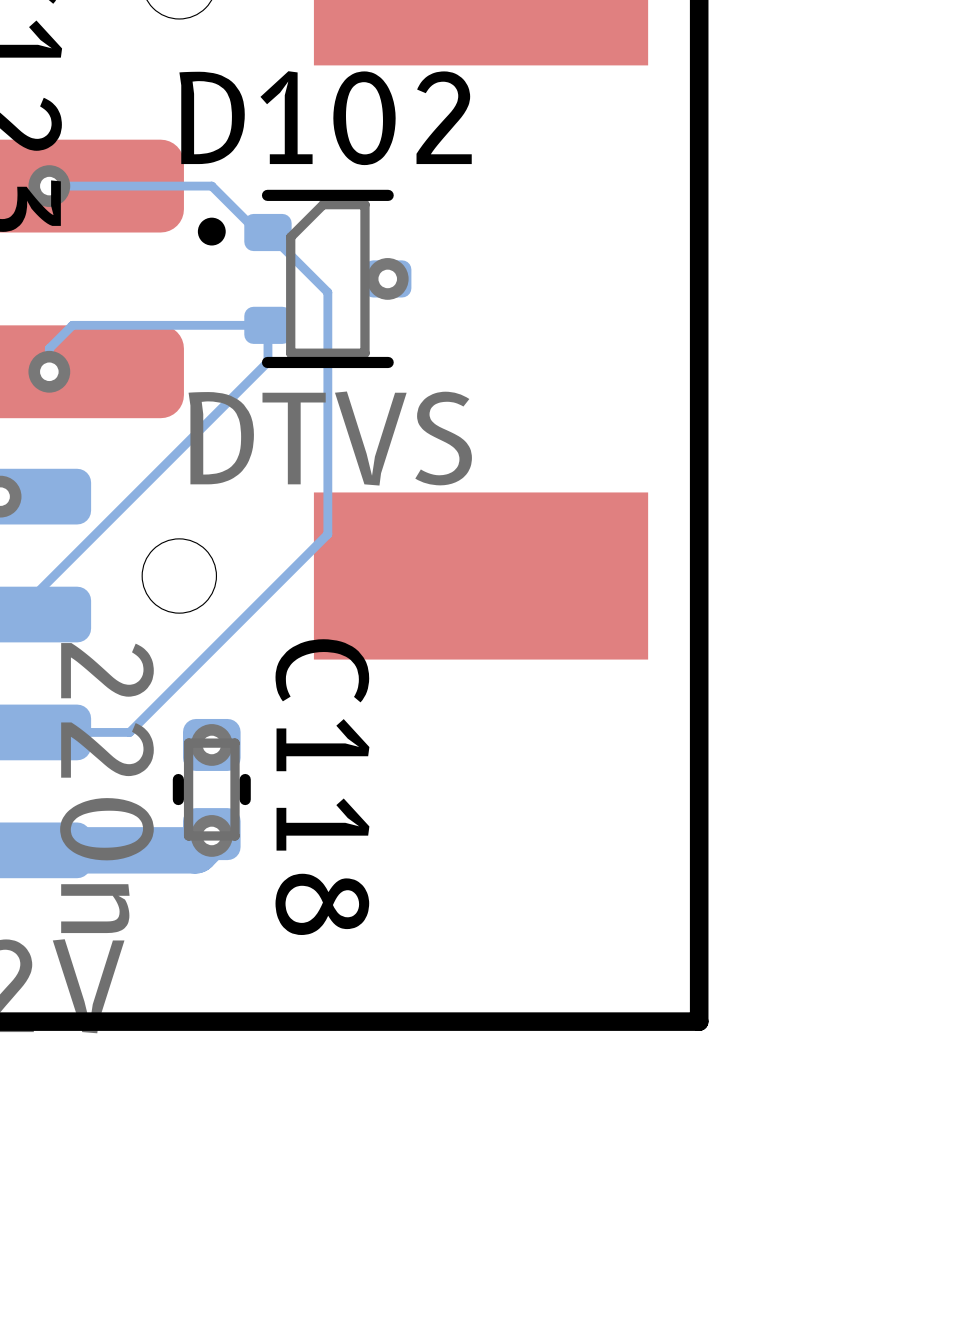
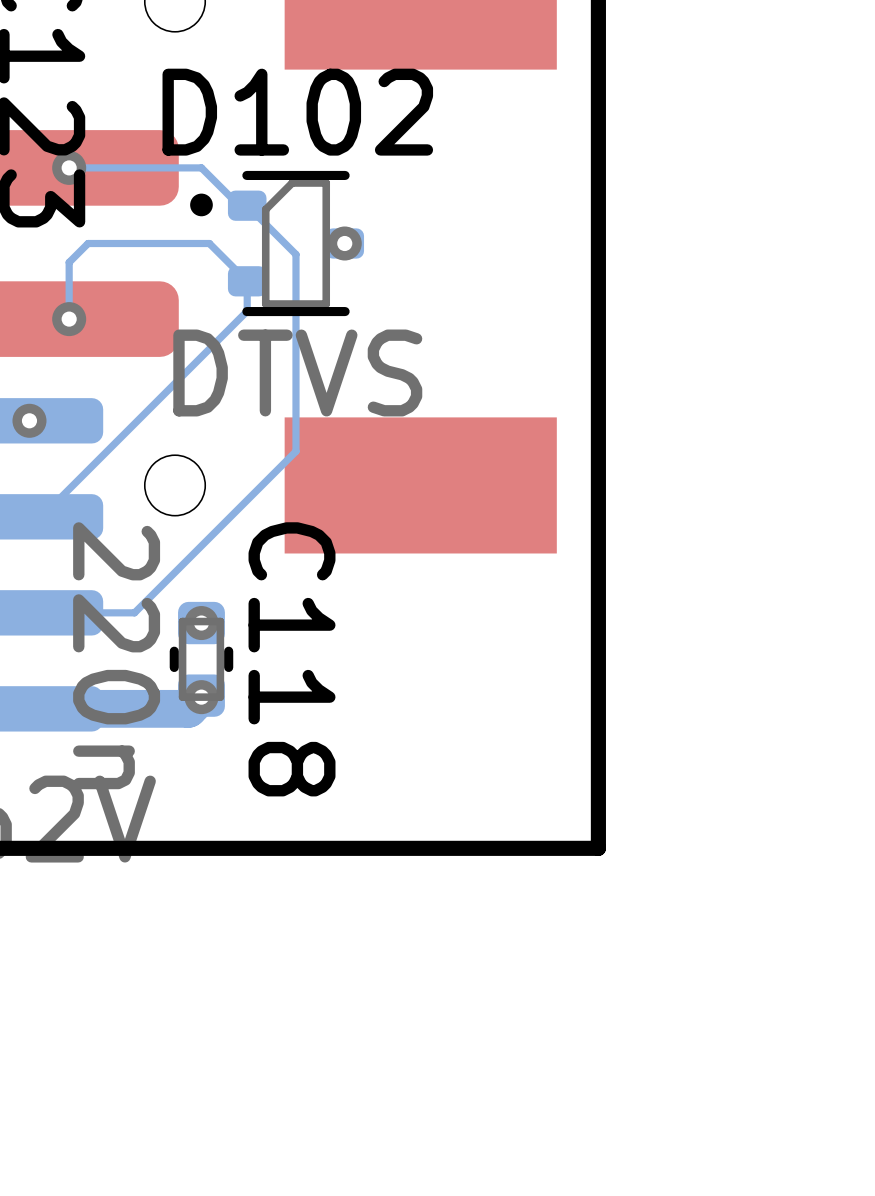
bottom track: (267, 325) (72, 325) (49, 348) -> (247, 281) (209, 243) (88, 243) (69, 262) (69, 300)

